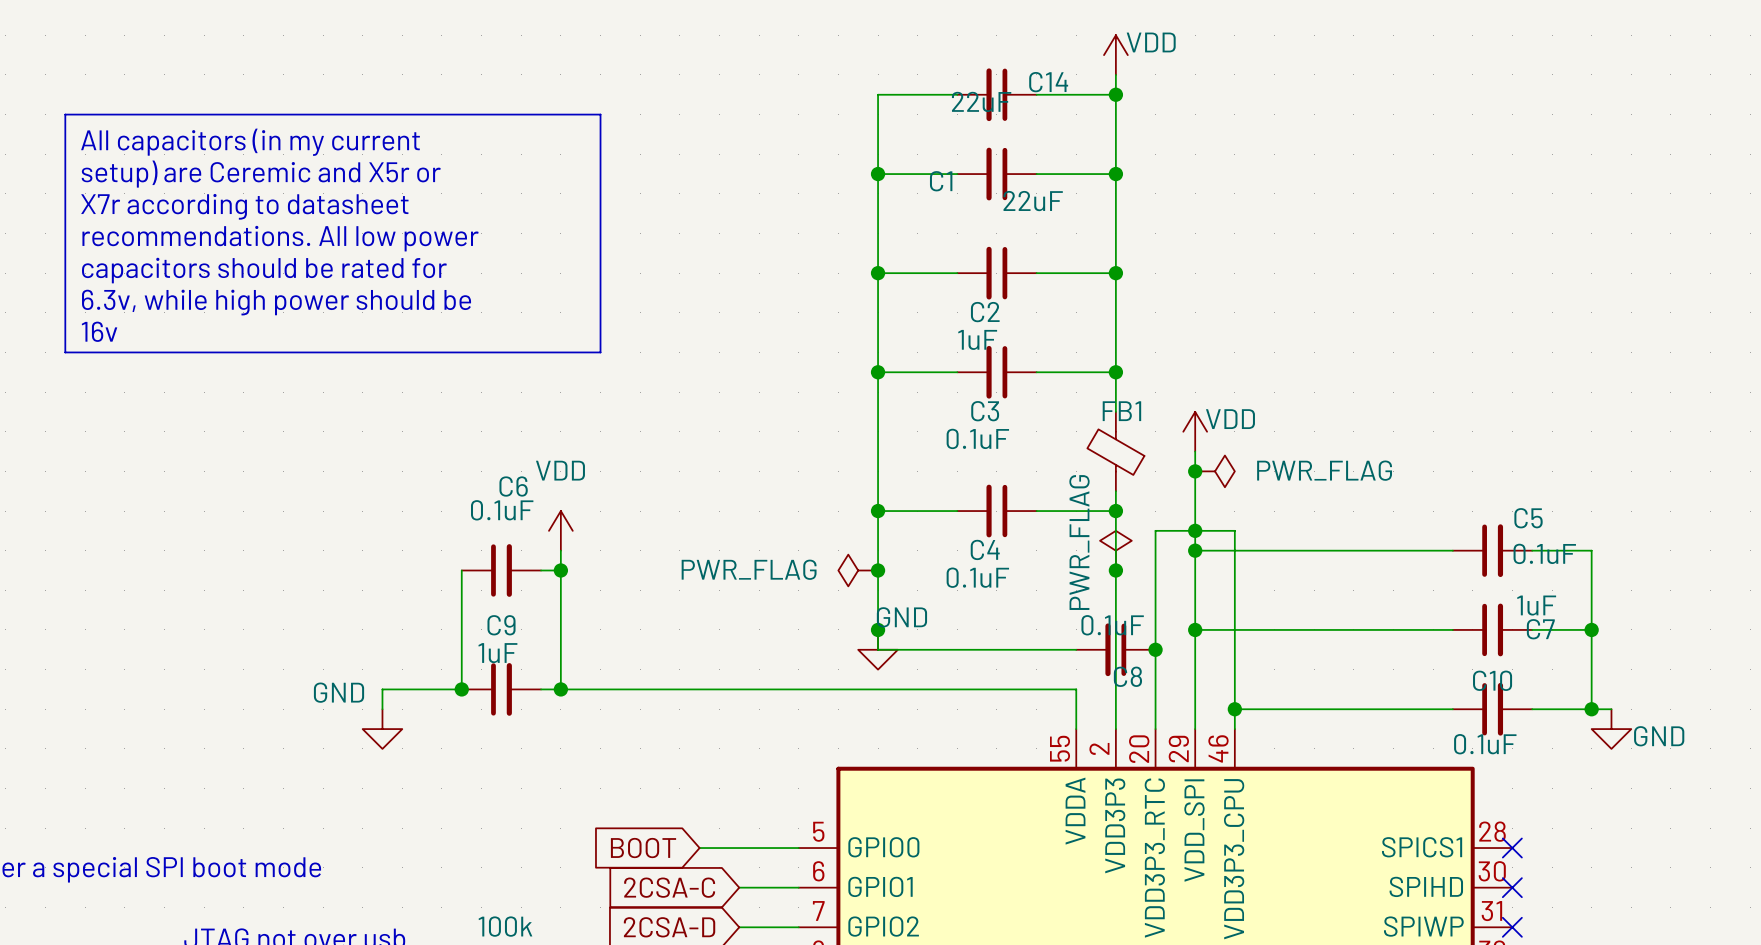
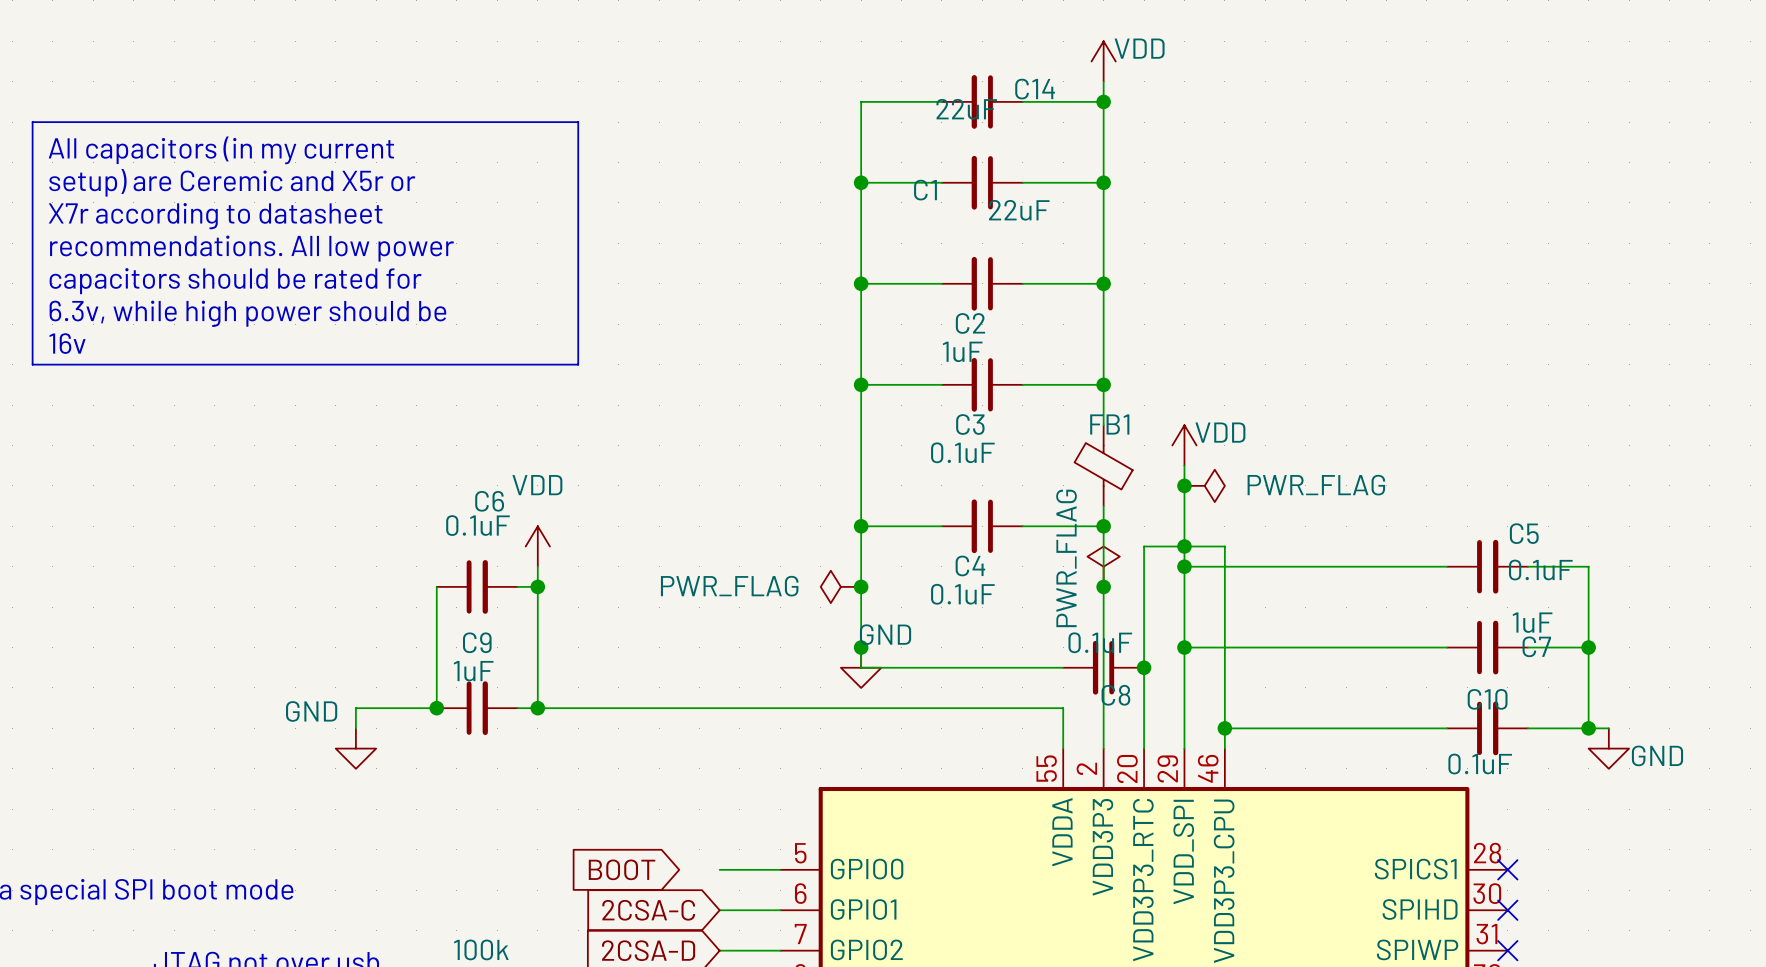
wire: (699, 848) (739, 848) -> none

